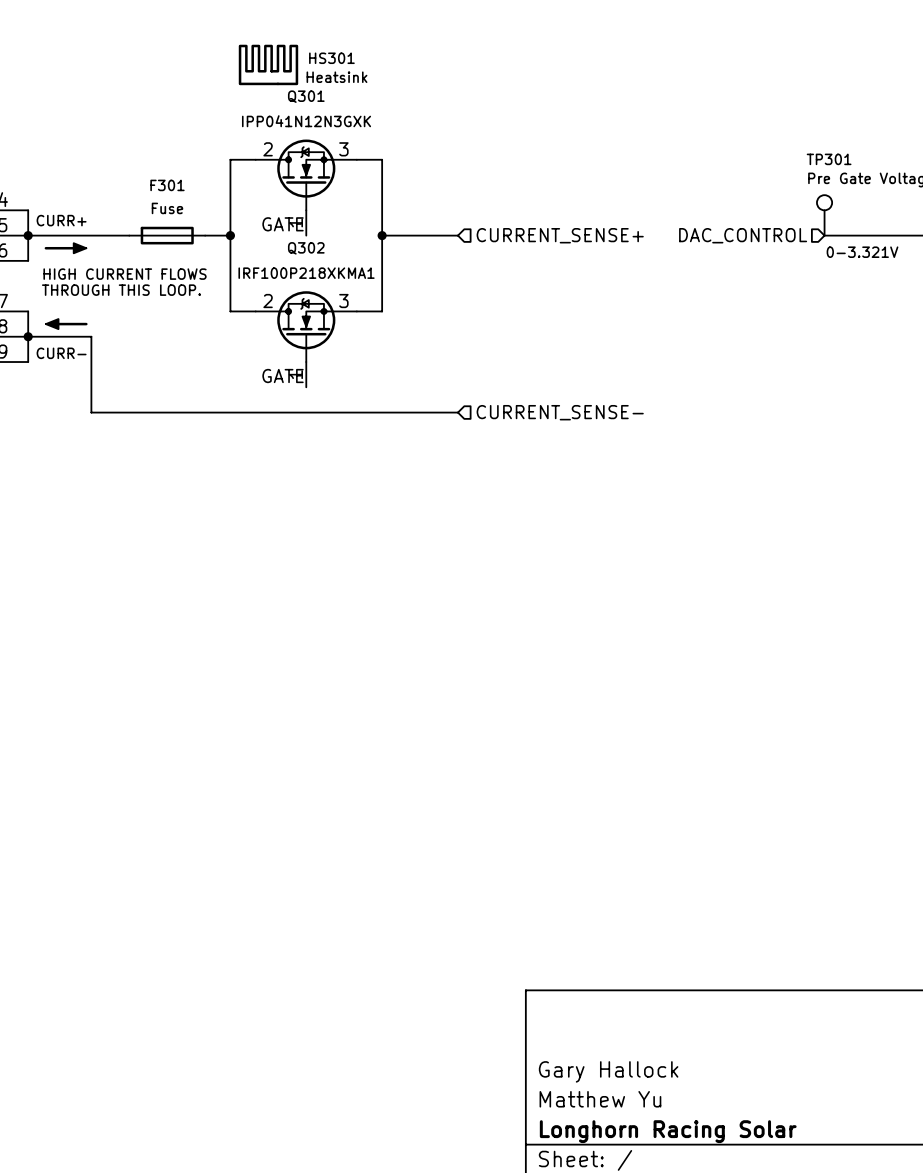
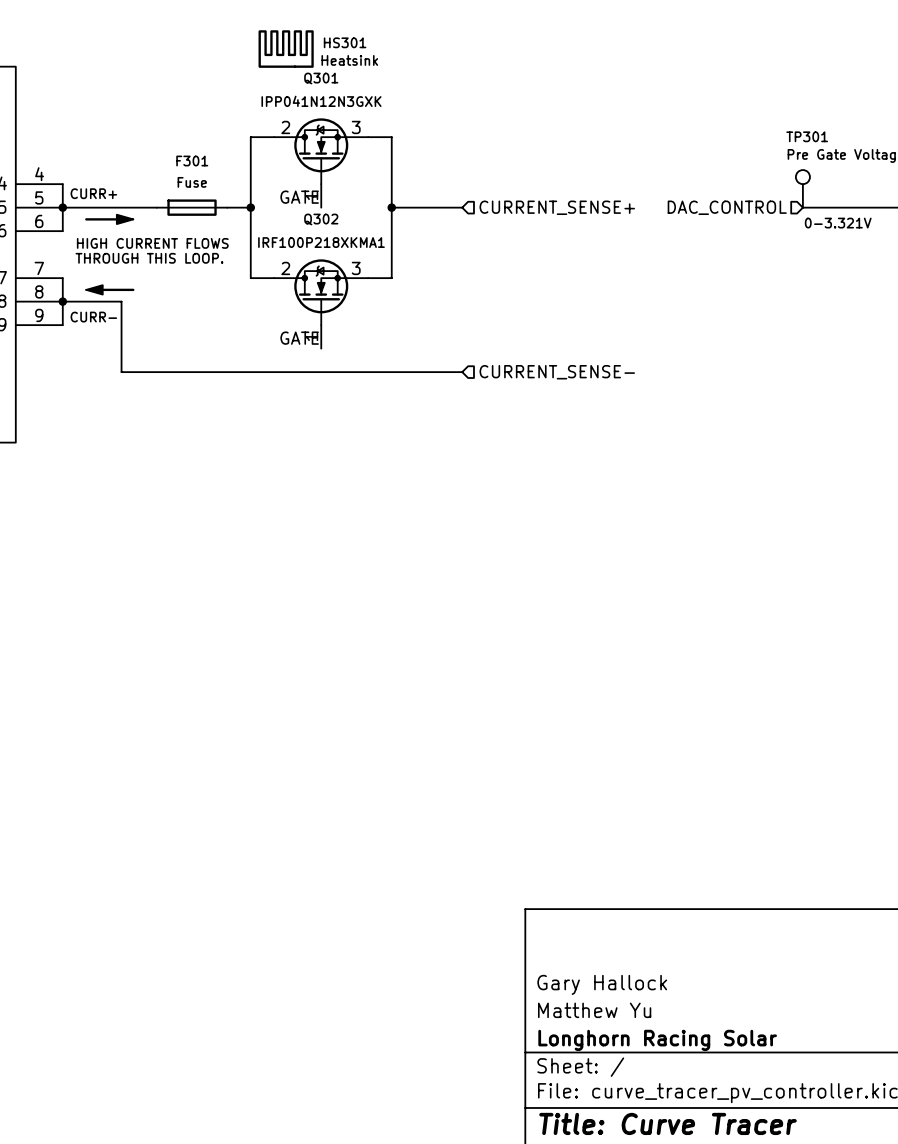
power symbol: (65, 248) -> none
power symbol: none -> (109, 219)
power symbol: (66, 324) -> none
power symbol: none -> (110, 289)

